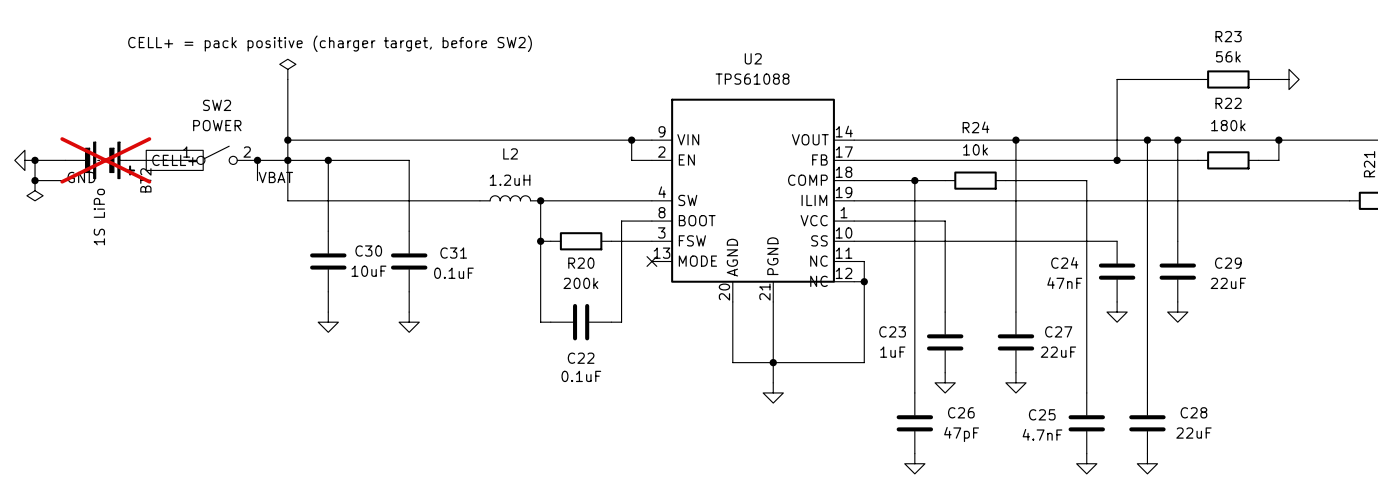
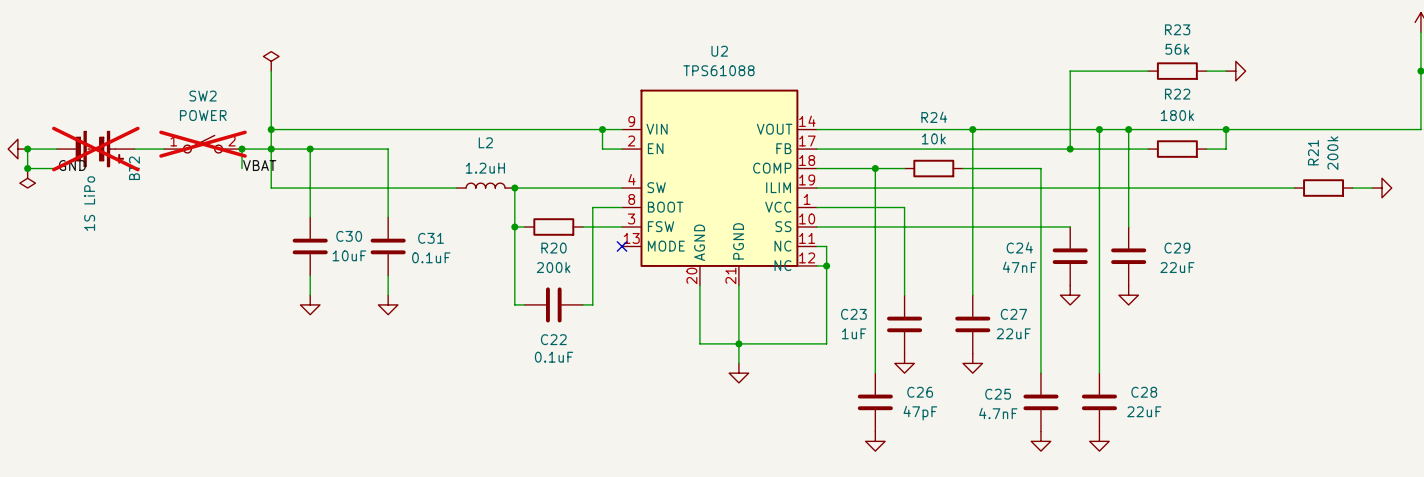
text: CELL+ = pack positive (charger target, before SW2) (330, 43) -> none
SW2 do-not-place cross: none -> (203, 144)
global label: CELL+ (174, 160) -> none

